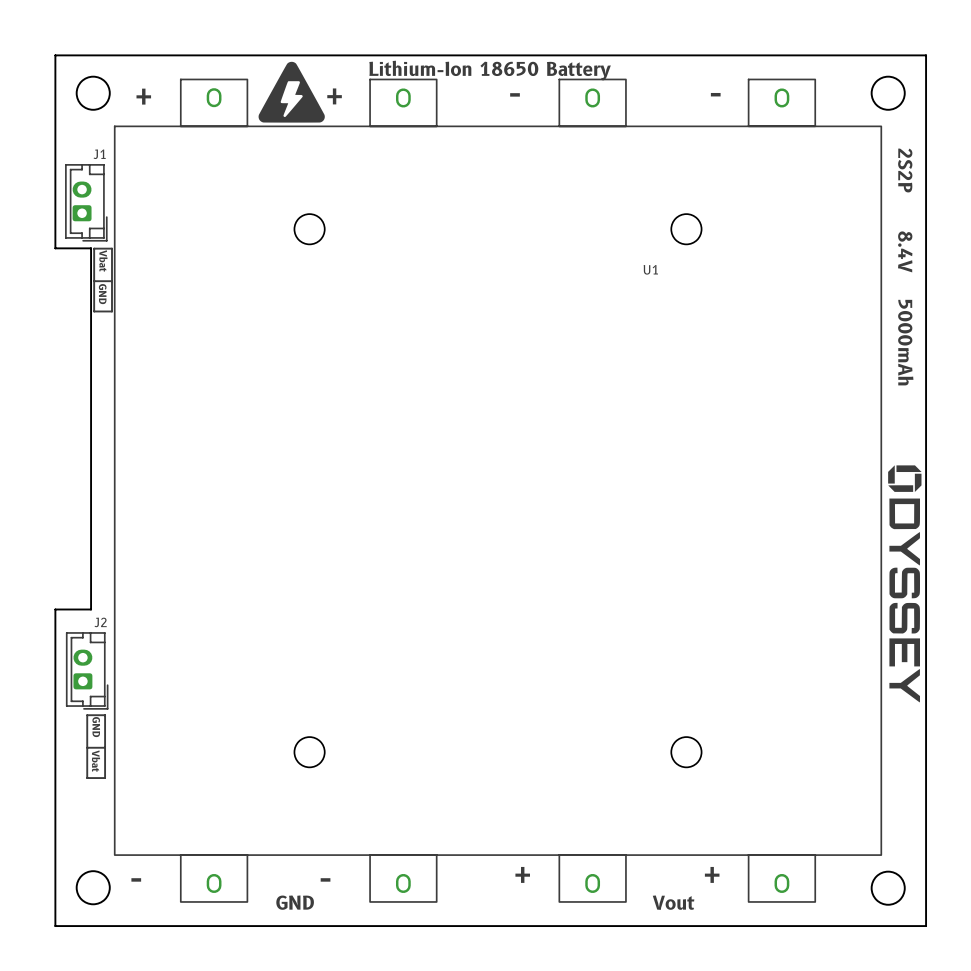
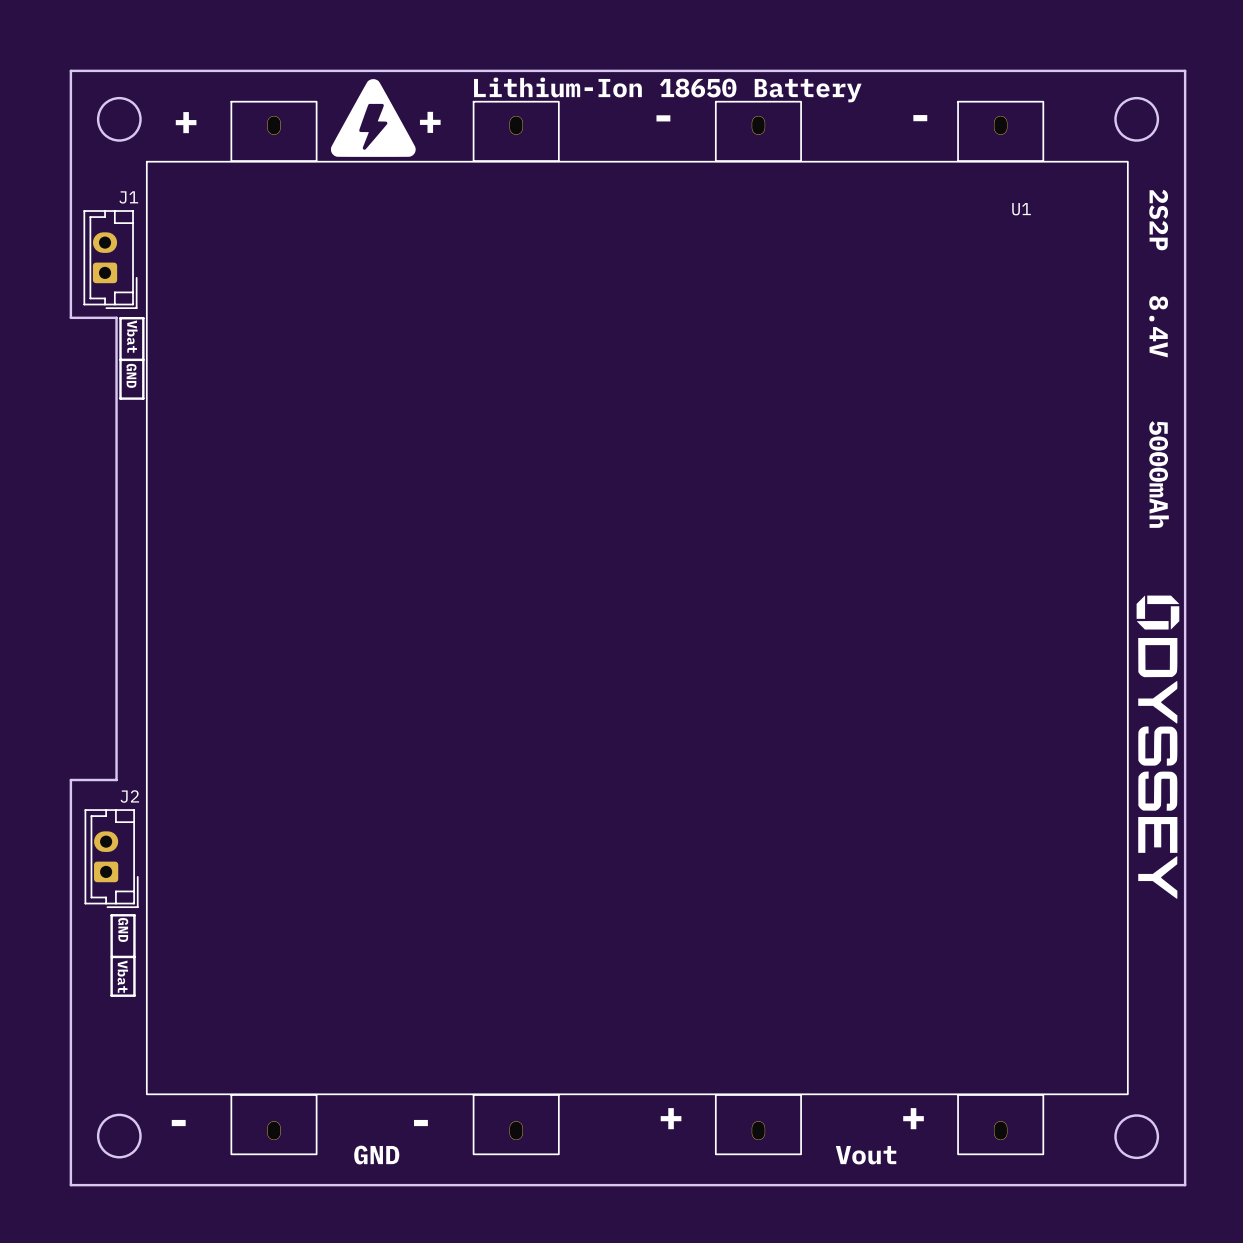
U1 footprint: [114, 78, 882, 903] -> [146, 100, 1129, 1156]
U1 name position: U1 (650, 269) -> U1 (1021, 209)

